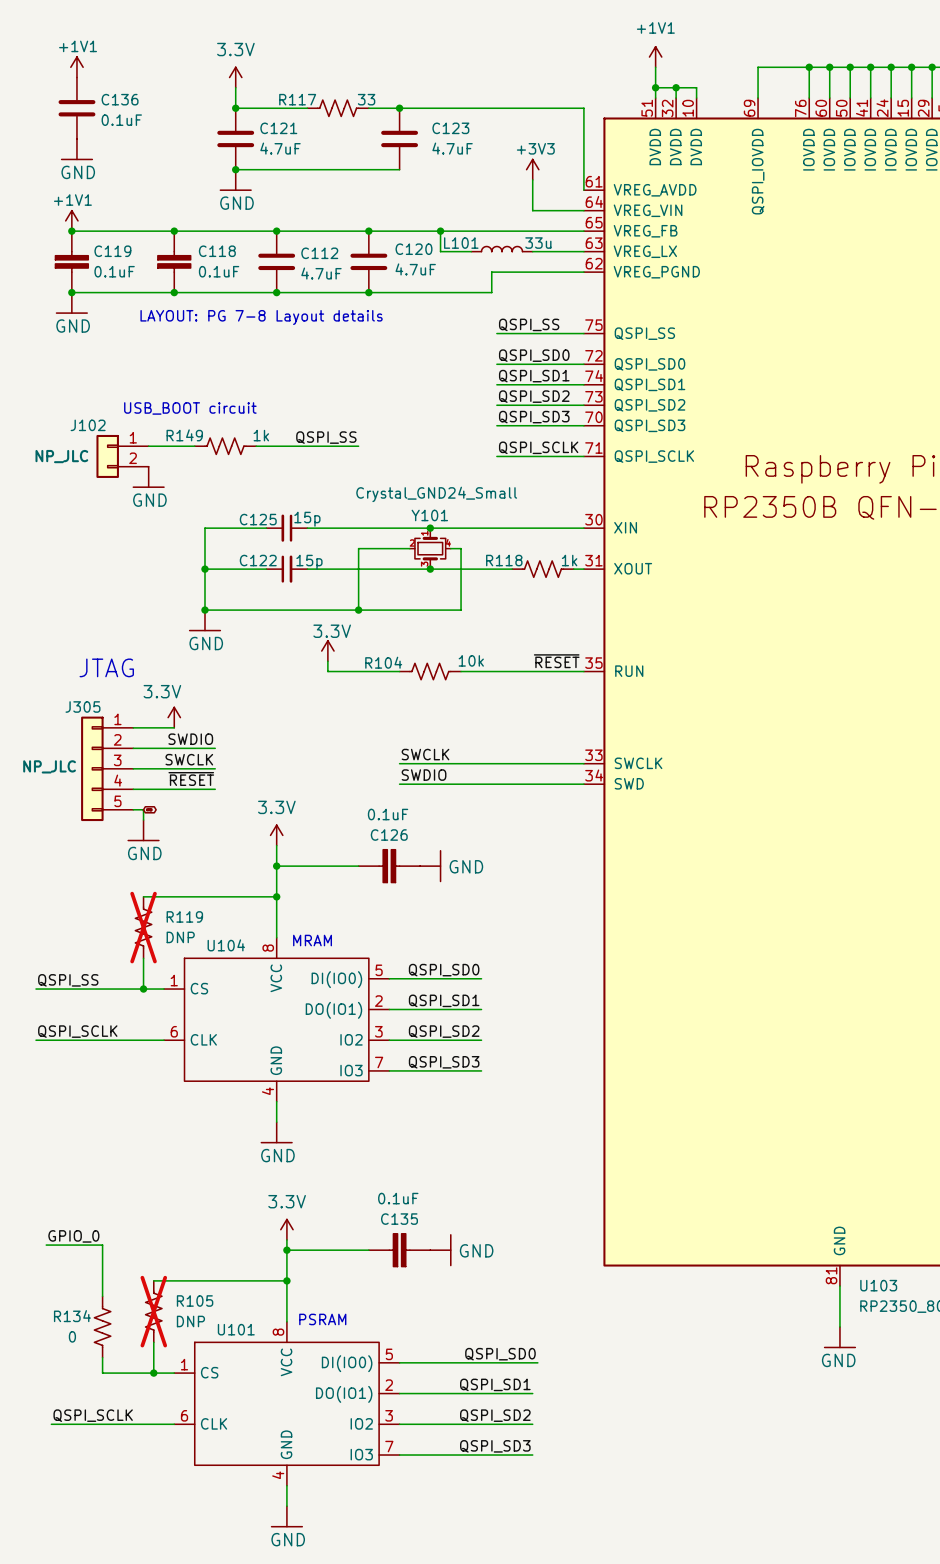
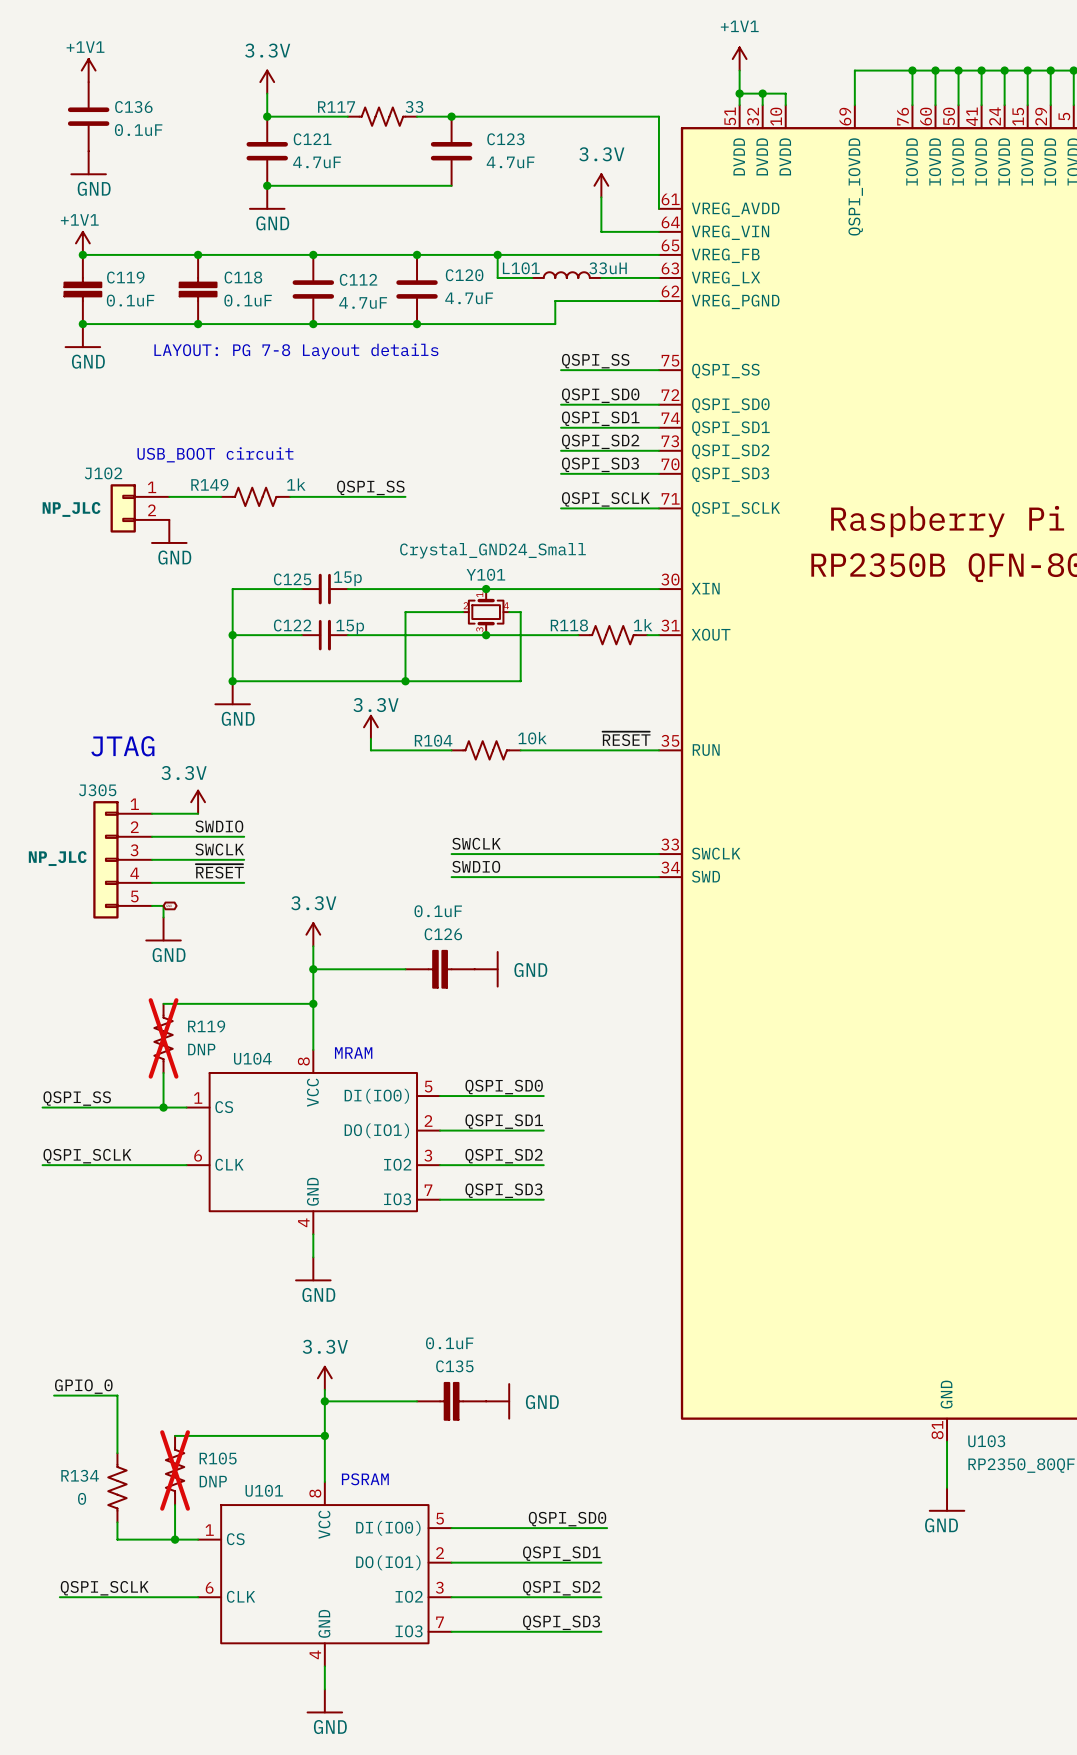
power symbol: +3V3 (532, 169) -> 3.3V (601, 185)
L101 value: 33u (538, 243) -> 33uH (608, 268)

